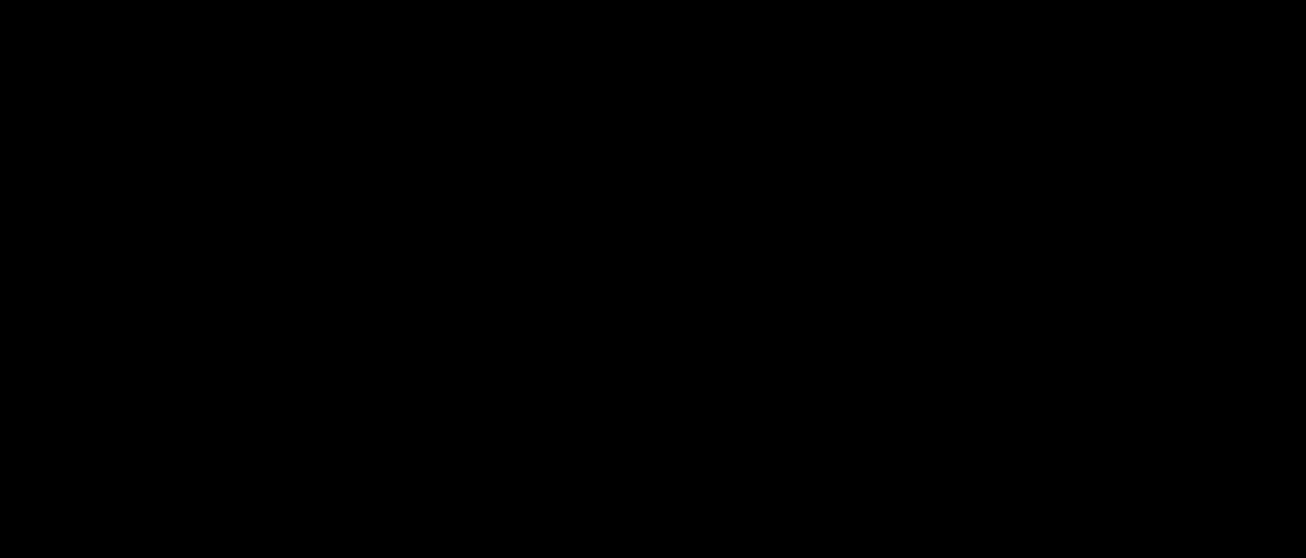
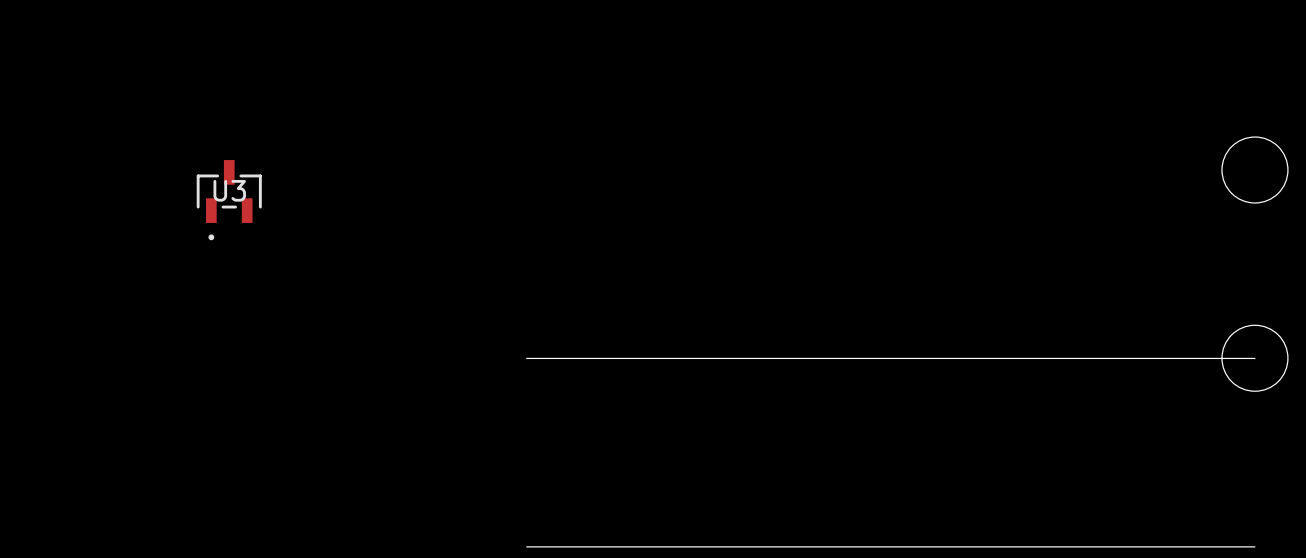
round board edge: none -> [1221, 136, 1289, 204]
U3: none -> (229, 200)
round board edge: none -> [1221, 324, 1289, 392]
board edge: none -> (526, 358) (1254, 358)
board edge: none -> (526, 546) (1254, 546)

